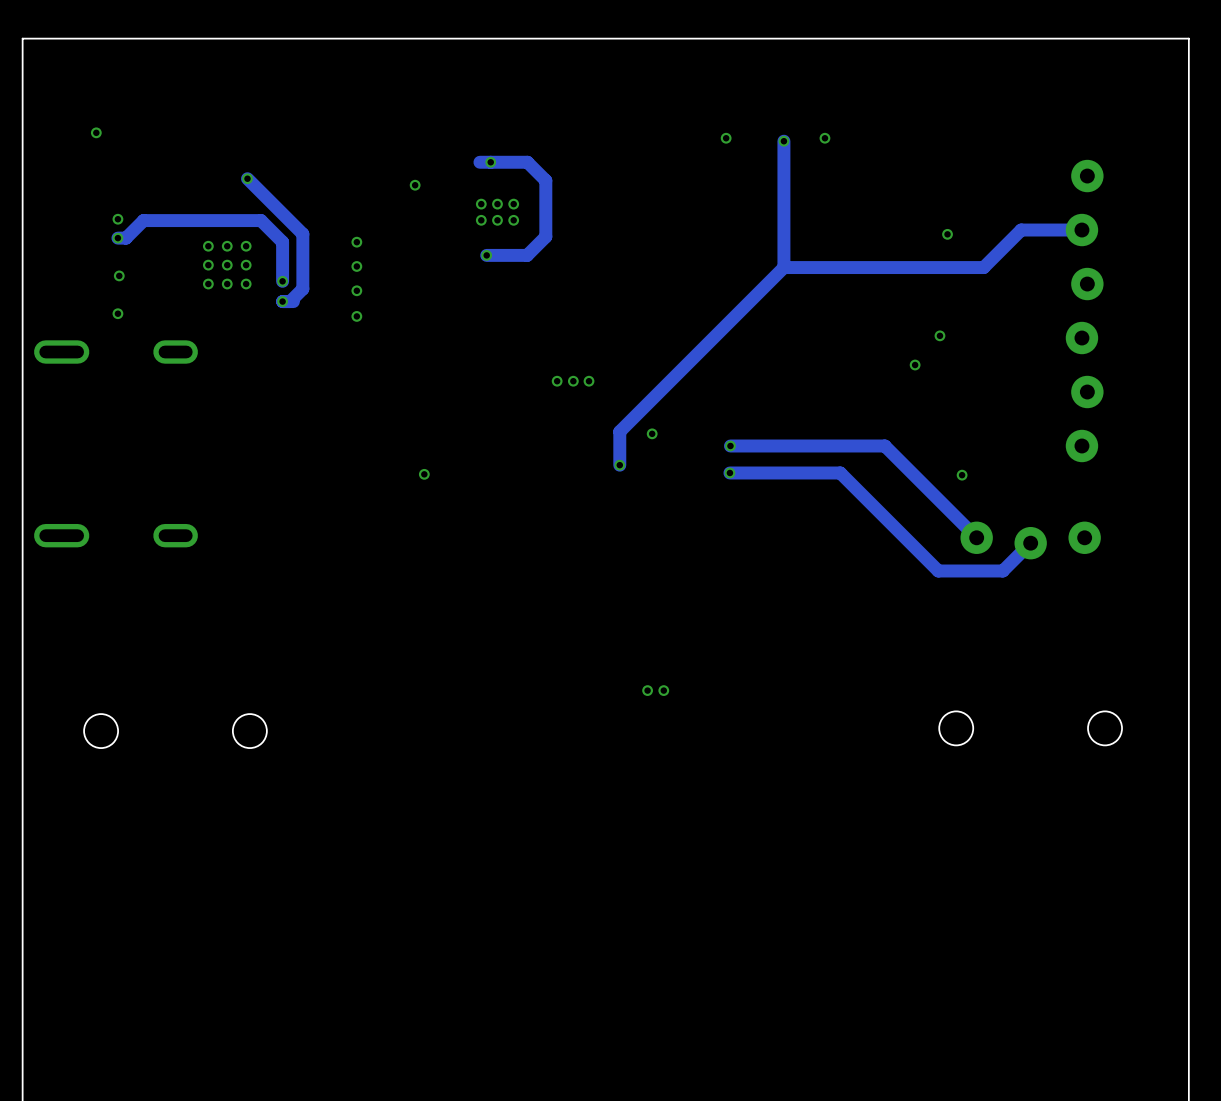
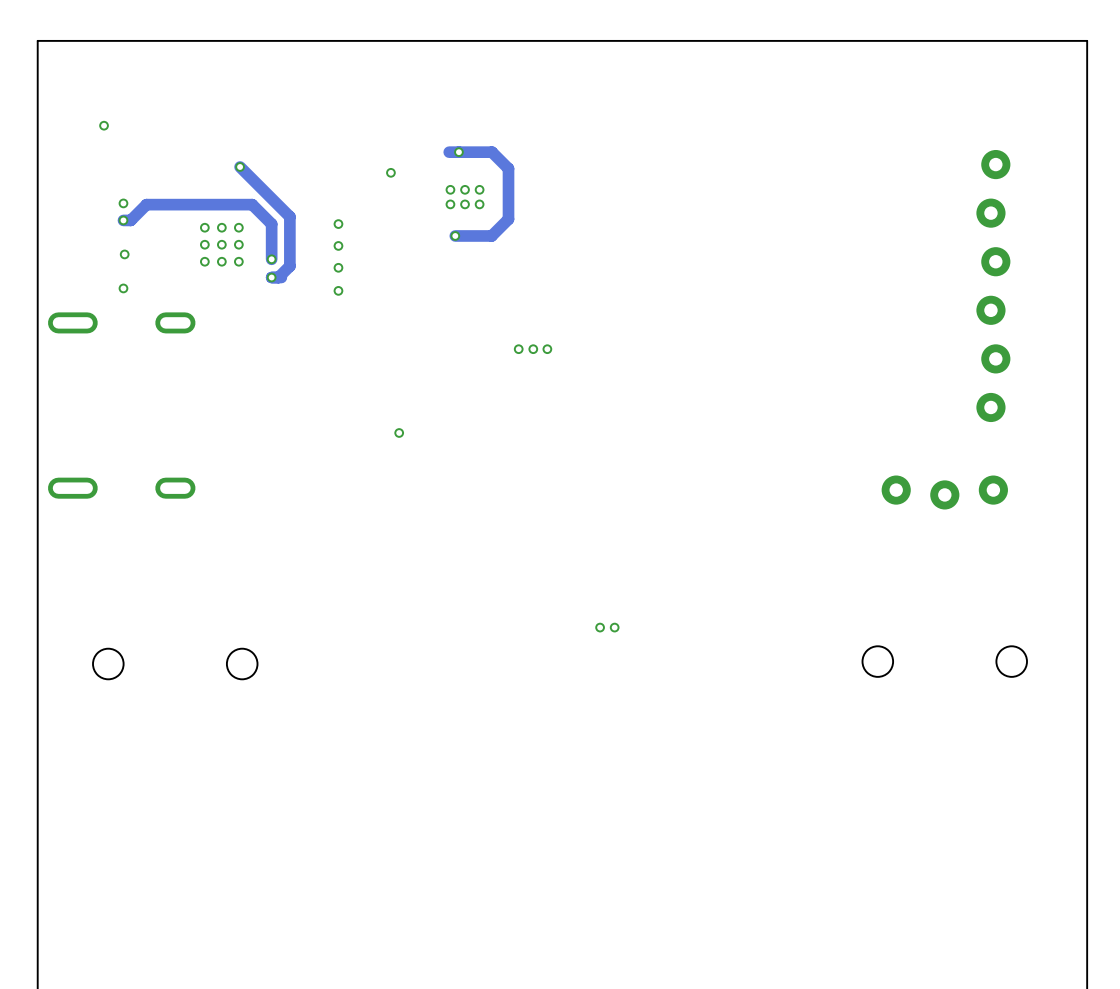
via: (726, 138) -> none
via: (824, 138) -> none
track: (783, 141) (783, 267) -> none
via: (783, 141) -> none
track: (1081, 230) (1021, 230) (983, 267) (783, 267) -> none
via: (947, 234) -> none
track: (783, 267) (619, 431) (619, 465) -> none
via: (939, 335) -> none
via: (915, 365) -> none
via: (652, 433) -> none
track: (730, 445) (884, 445) (976, 537) -> none
via: (730, 445) -> none
via: (619, 465) -> none
track: (729, 472) (840, 472) (938, 570) (1002, 570) (1030, 543) -> none
via: (729, 472) -> none
via: (962, 475) -> none

